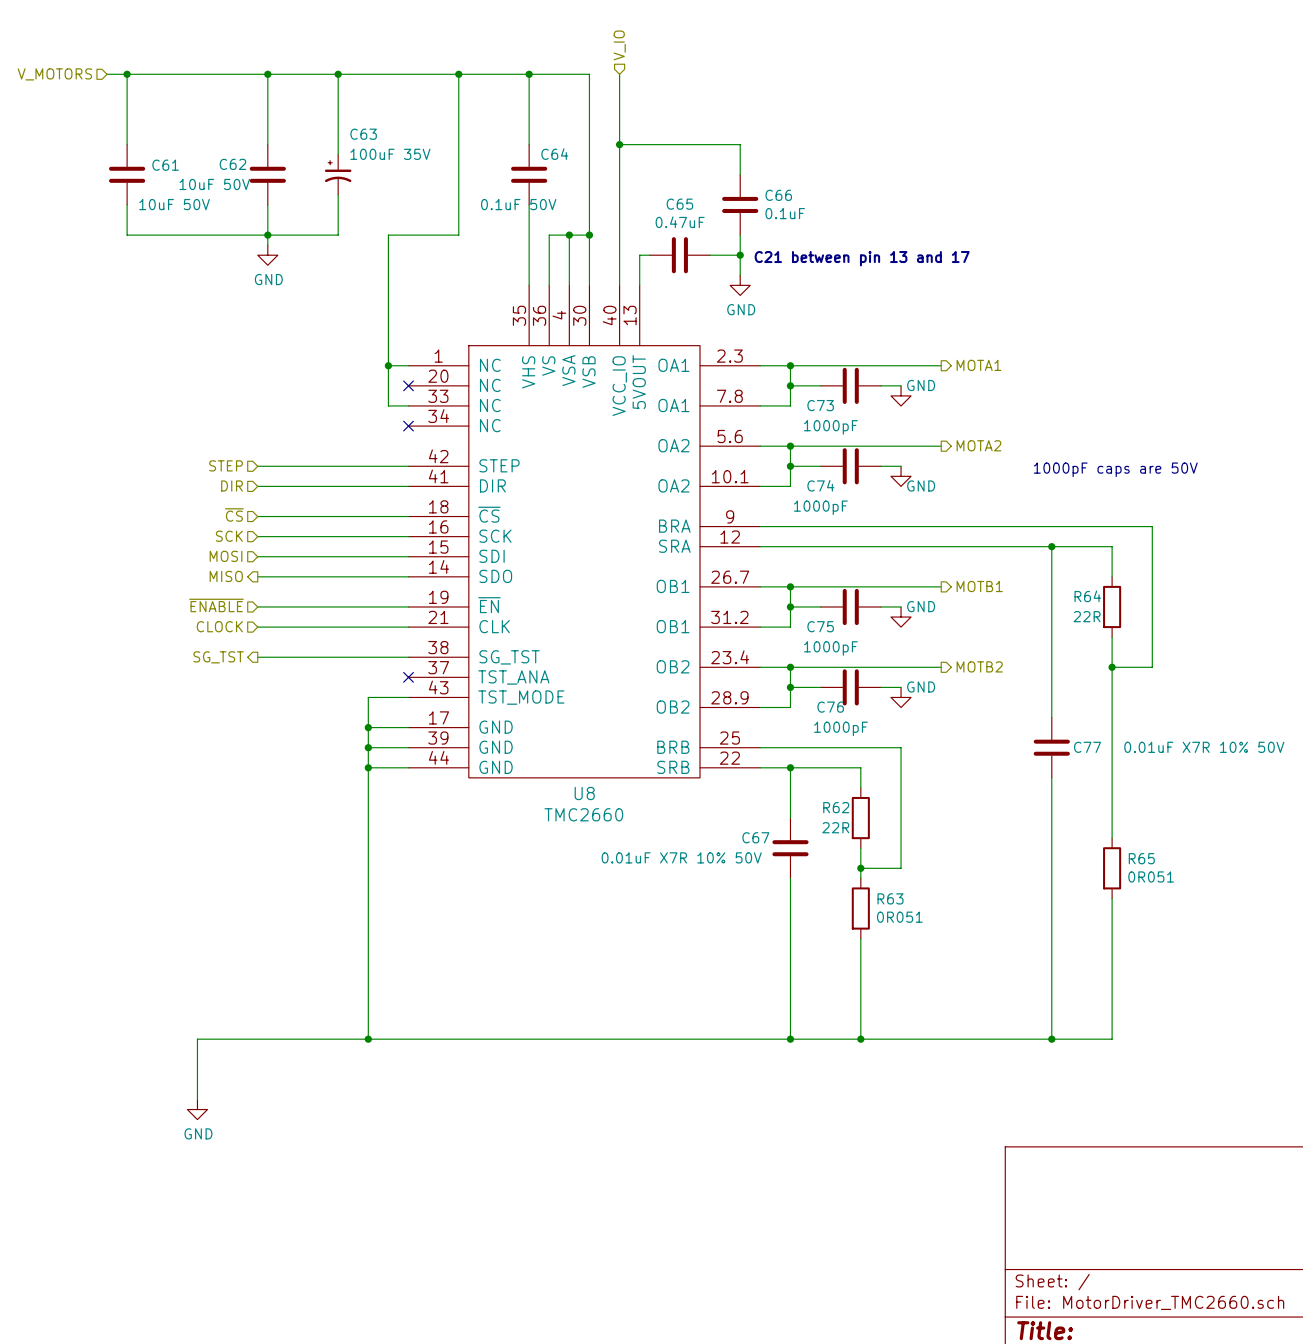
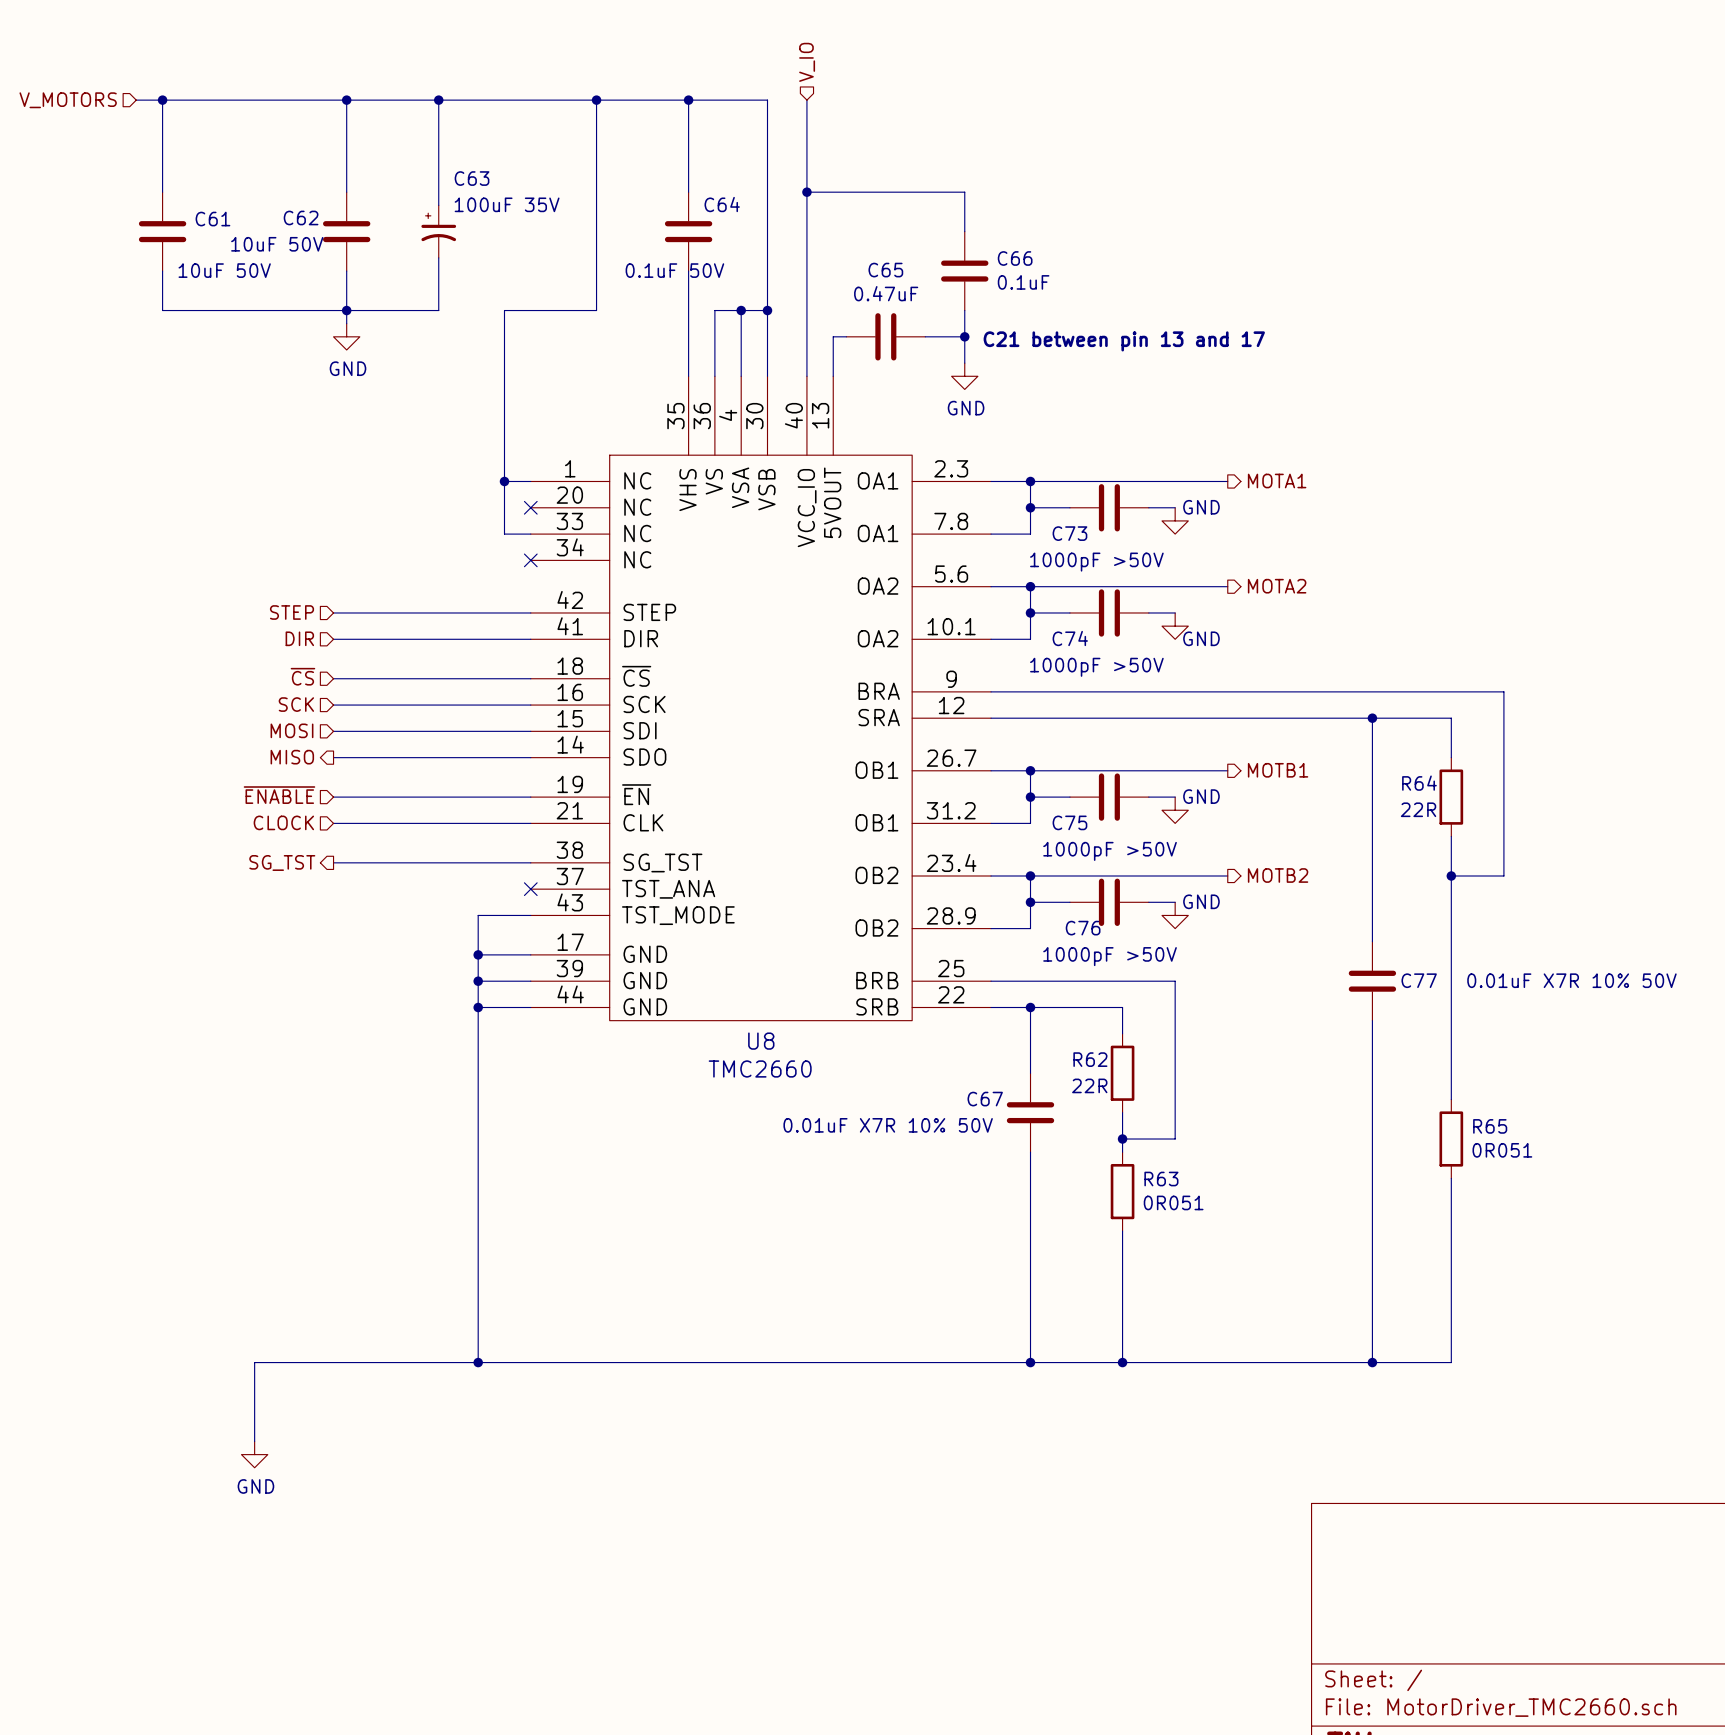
C73 value: 1000pF (830, 427) -> 1000pF >50V (1096, 562)
text: 1000pF caps are 50V (1115, 469) -> none
C74 value: 1000pF (820, 507) -> 1000pF >50V (1096, 667)
C75 value: 1000pF (830, 648) -> 1000pF >50V (1110, 851)
C76 value: 1000pF (840, 728) -> 1000pF >50V (1110, 956)

